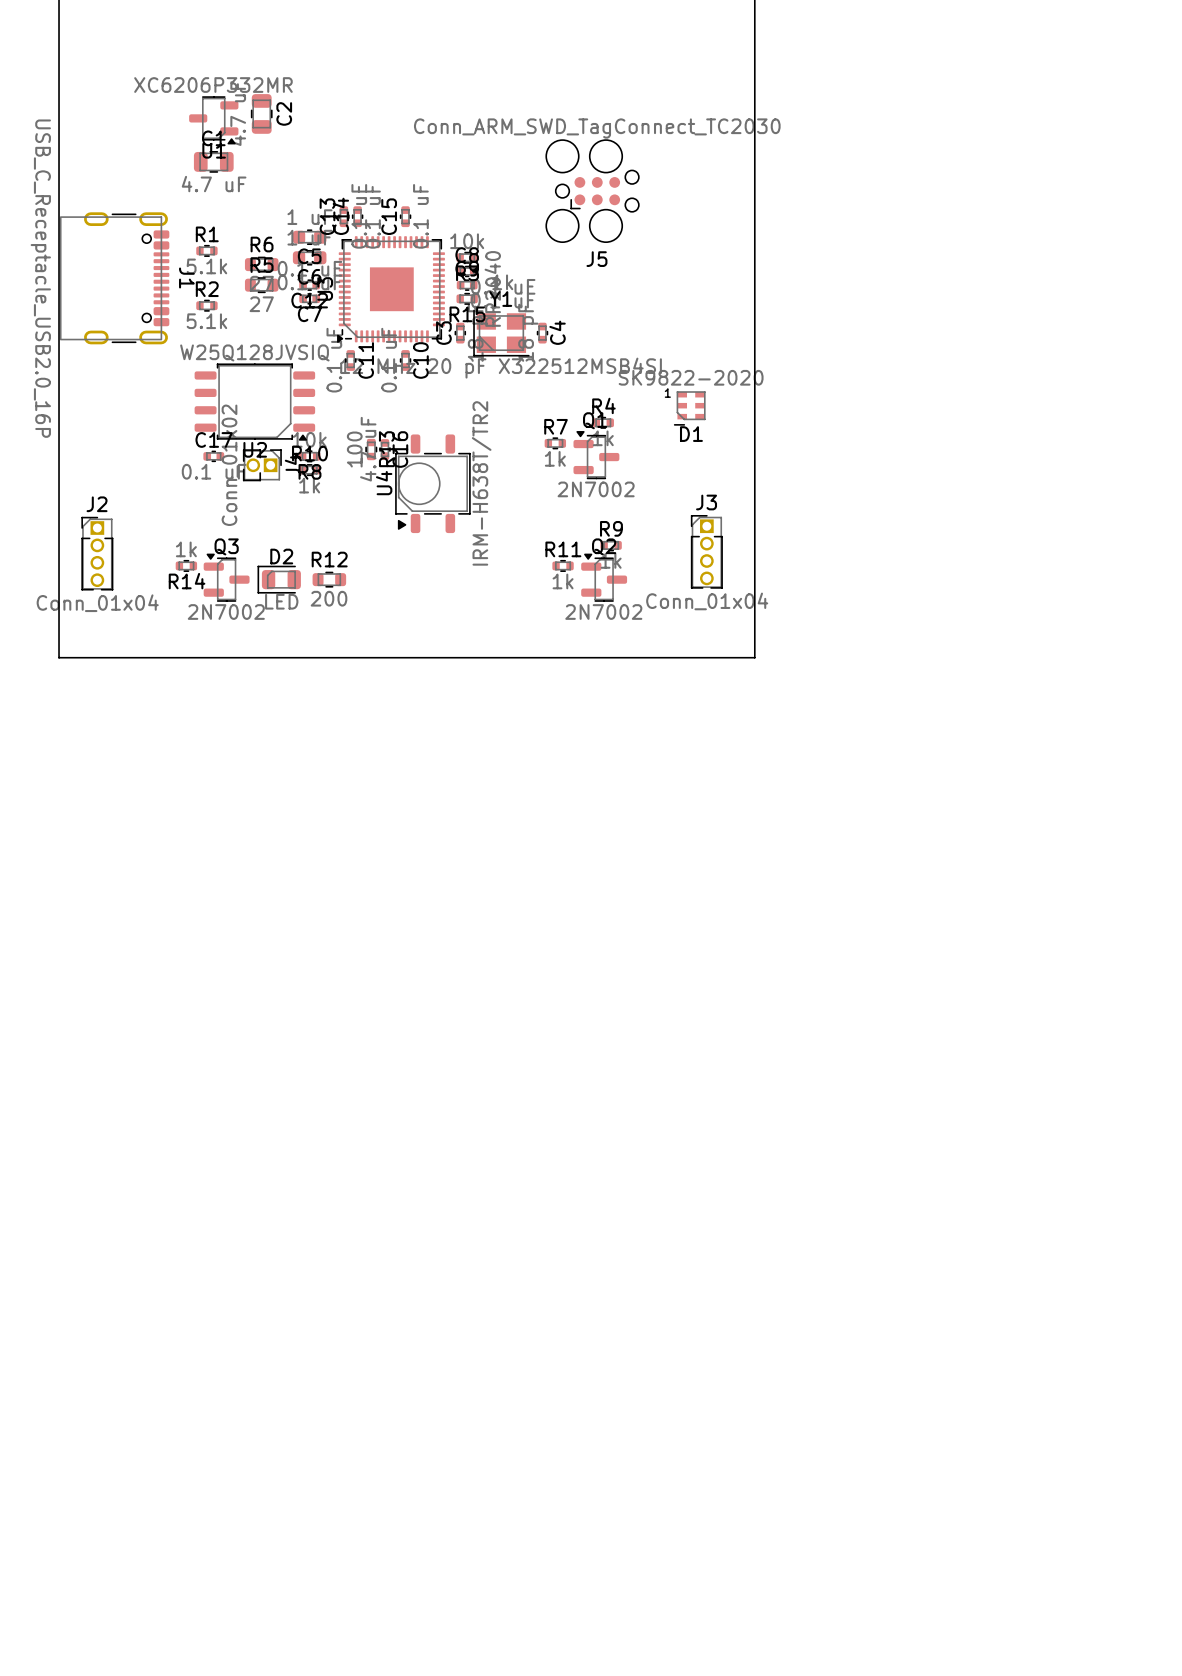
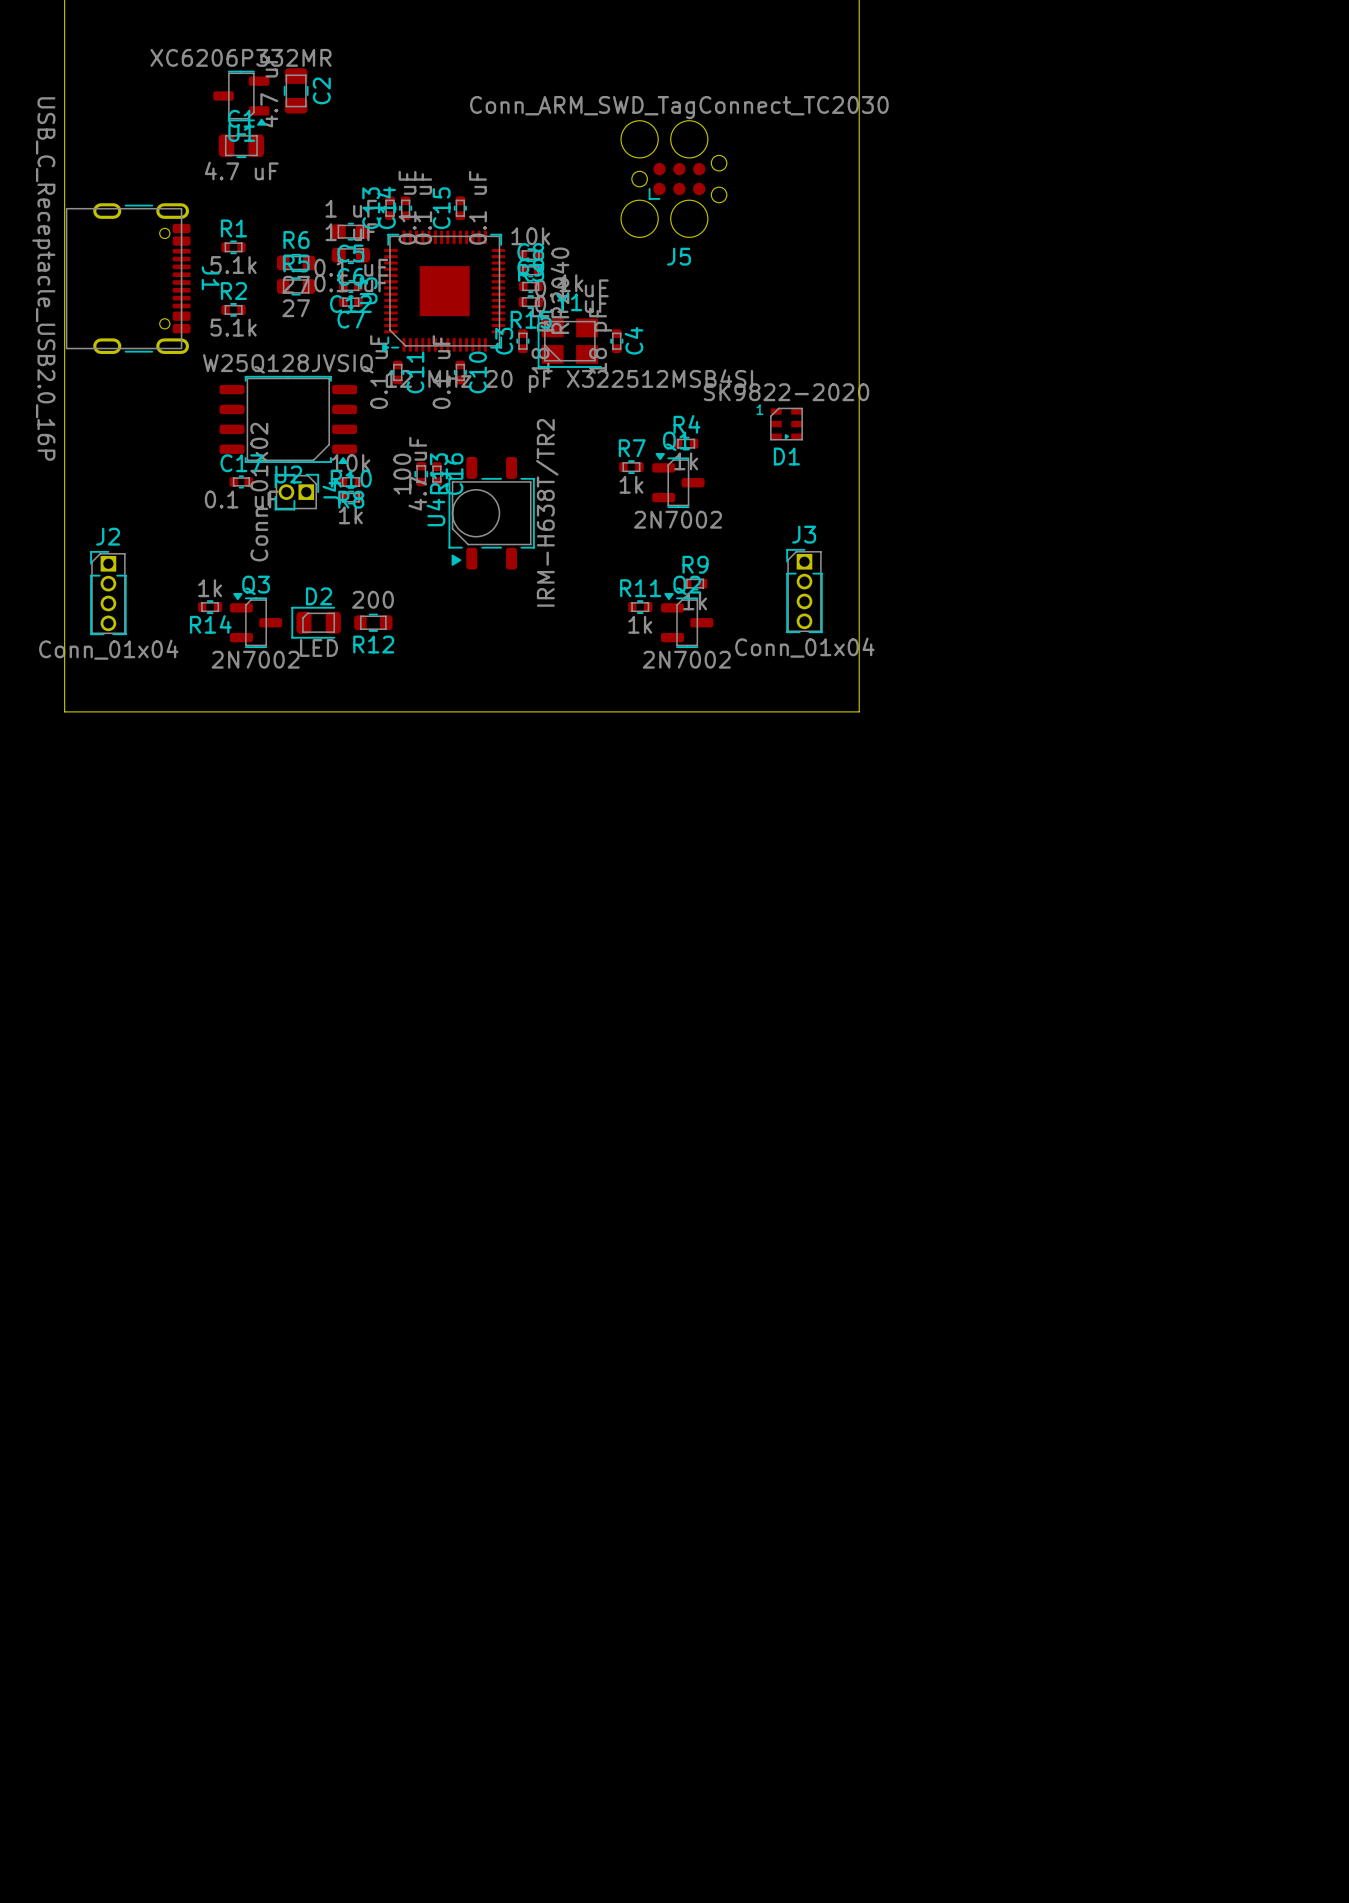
D1 footprint: [673, 391, 706, 426] -> [770, 407, 803, 441]
R12 name position: R12 (329, 559) -> R12 (373, 644)
R12 value position: 200 (329, 598) -> 200 (372, 599)

